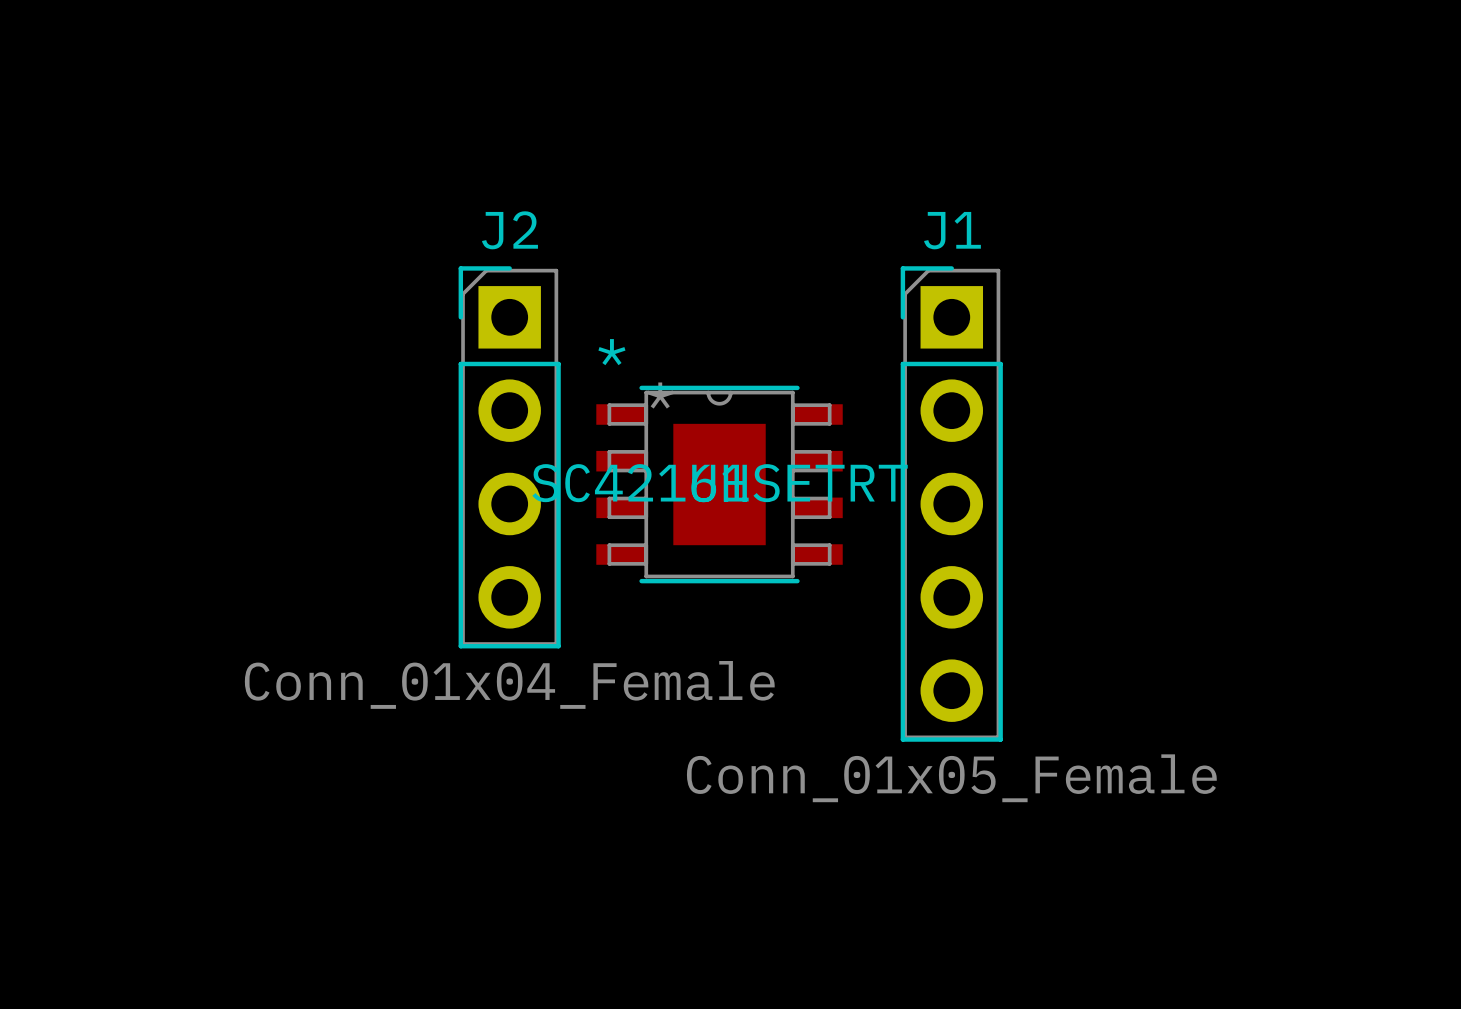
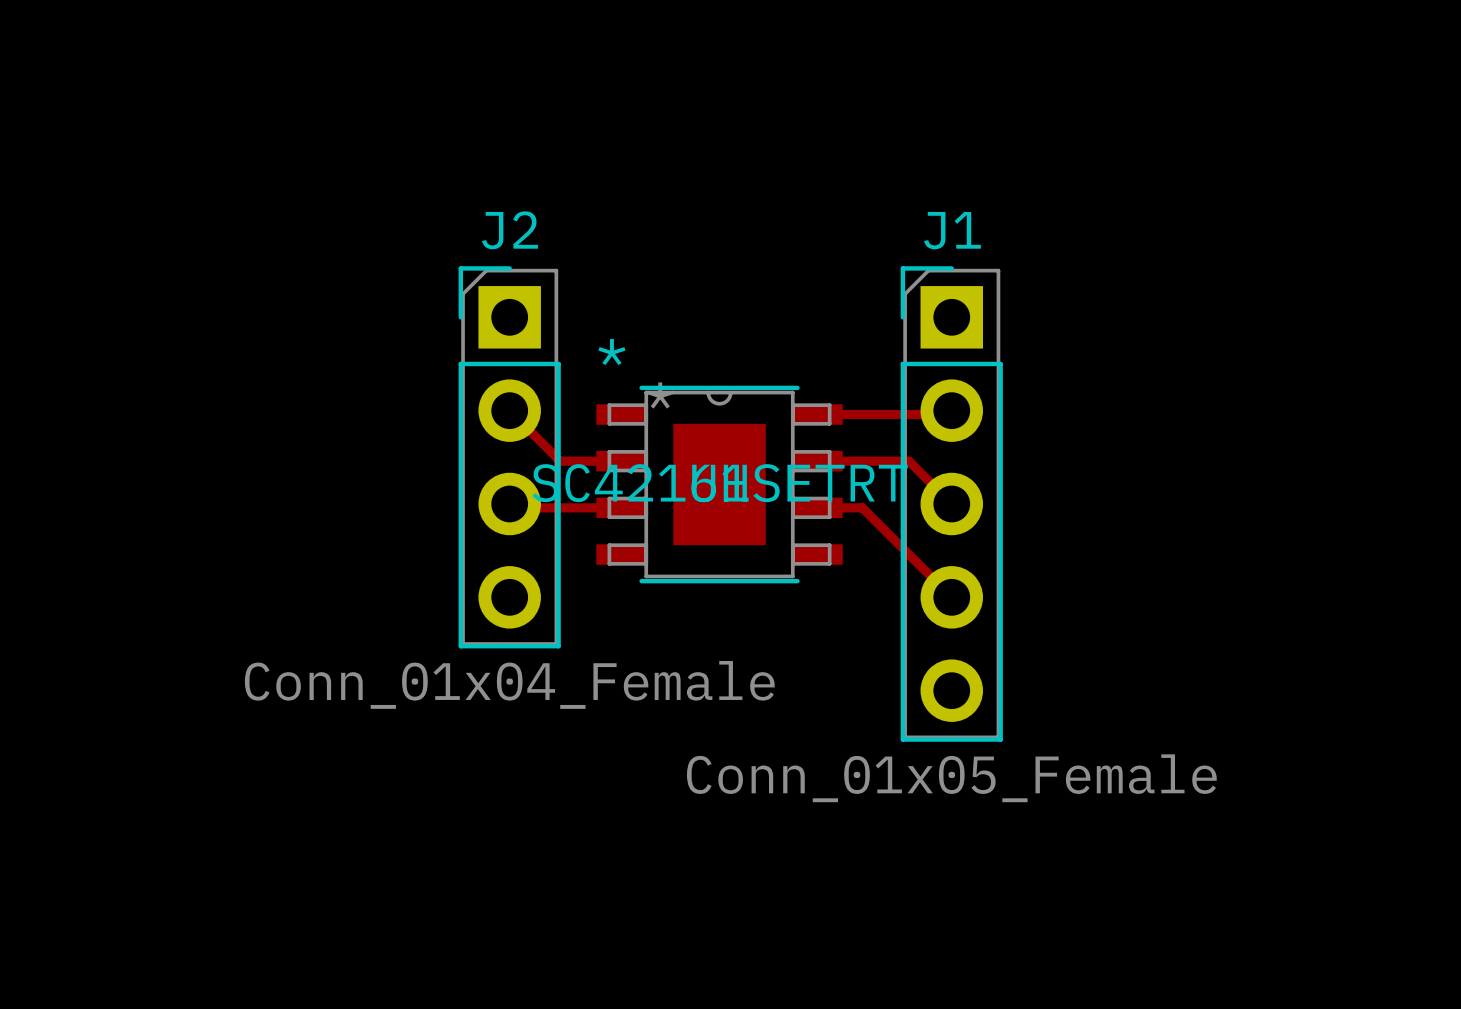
track: none -> (509, 410) (560, 461) (621, 461)
track: none -> (951, 410) (947, 414) (817, 414)
track: none -> (817, 461) (908, 461) (951, 503)
track: none -> (509, 503) (513, 507) (621, 507)
track: none -> (817, 507) (862, 507) (951, 597)

